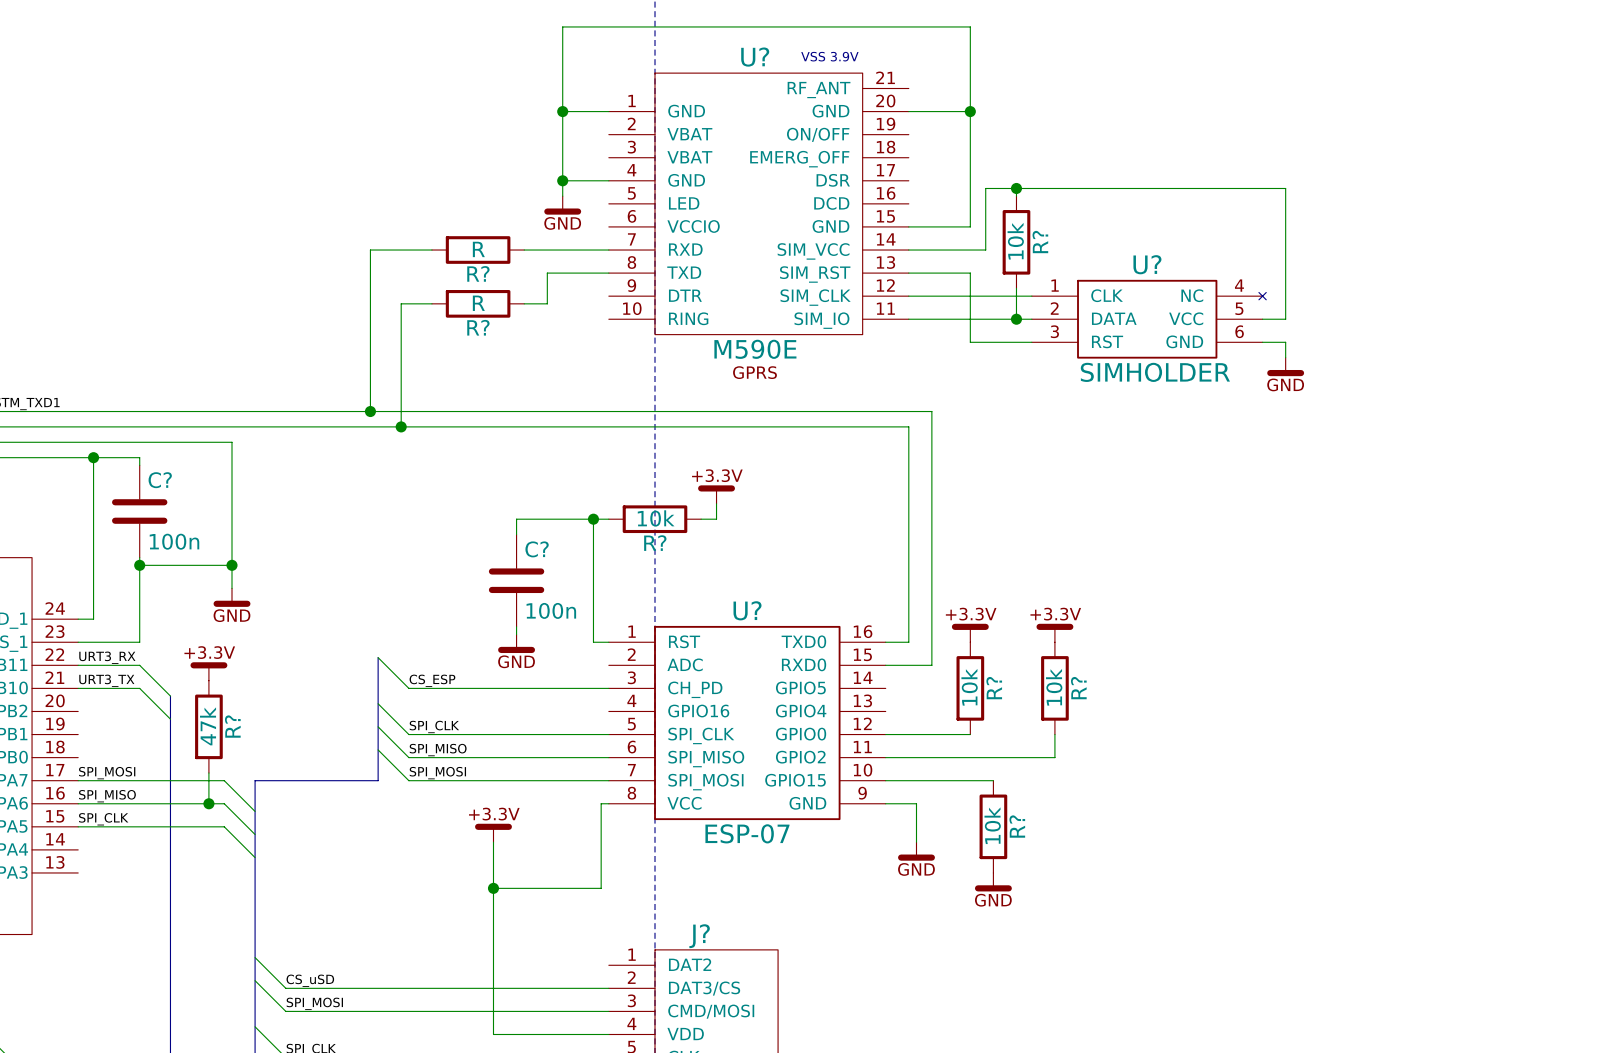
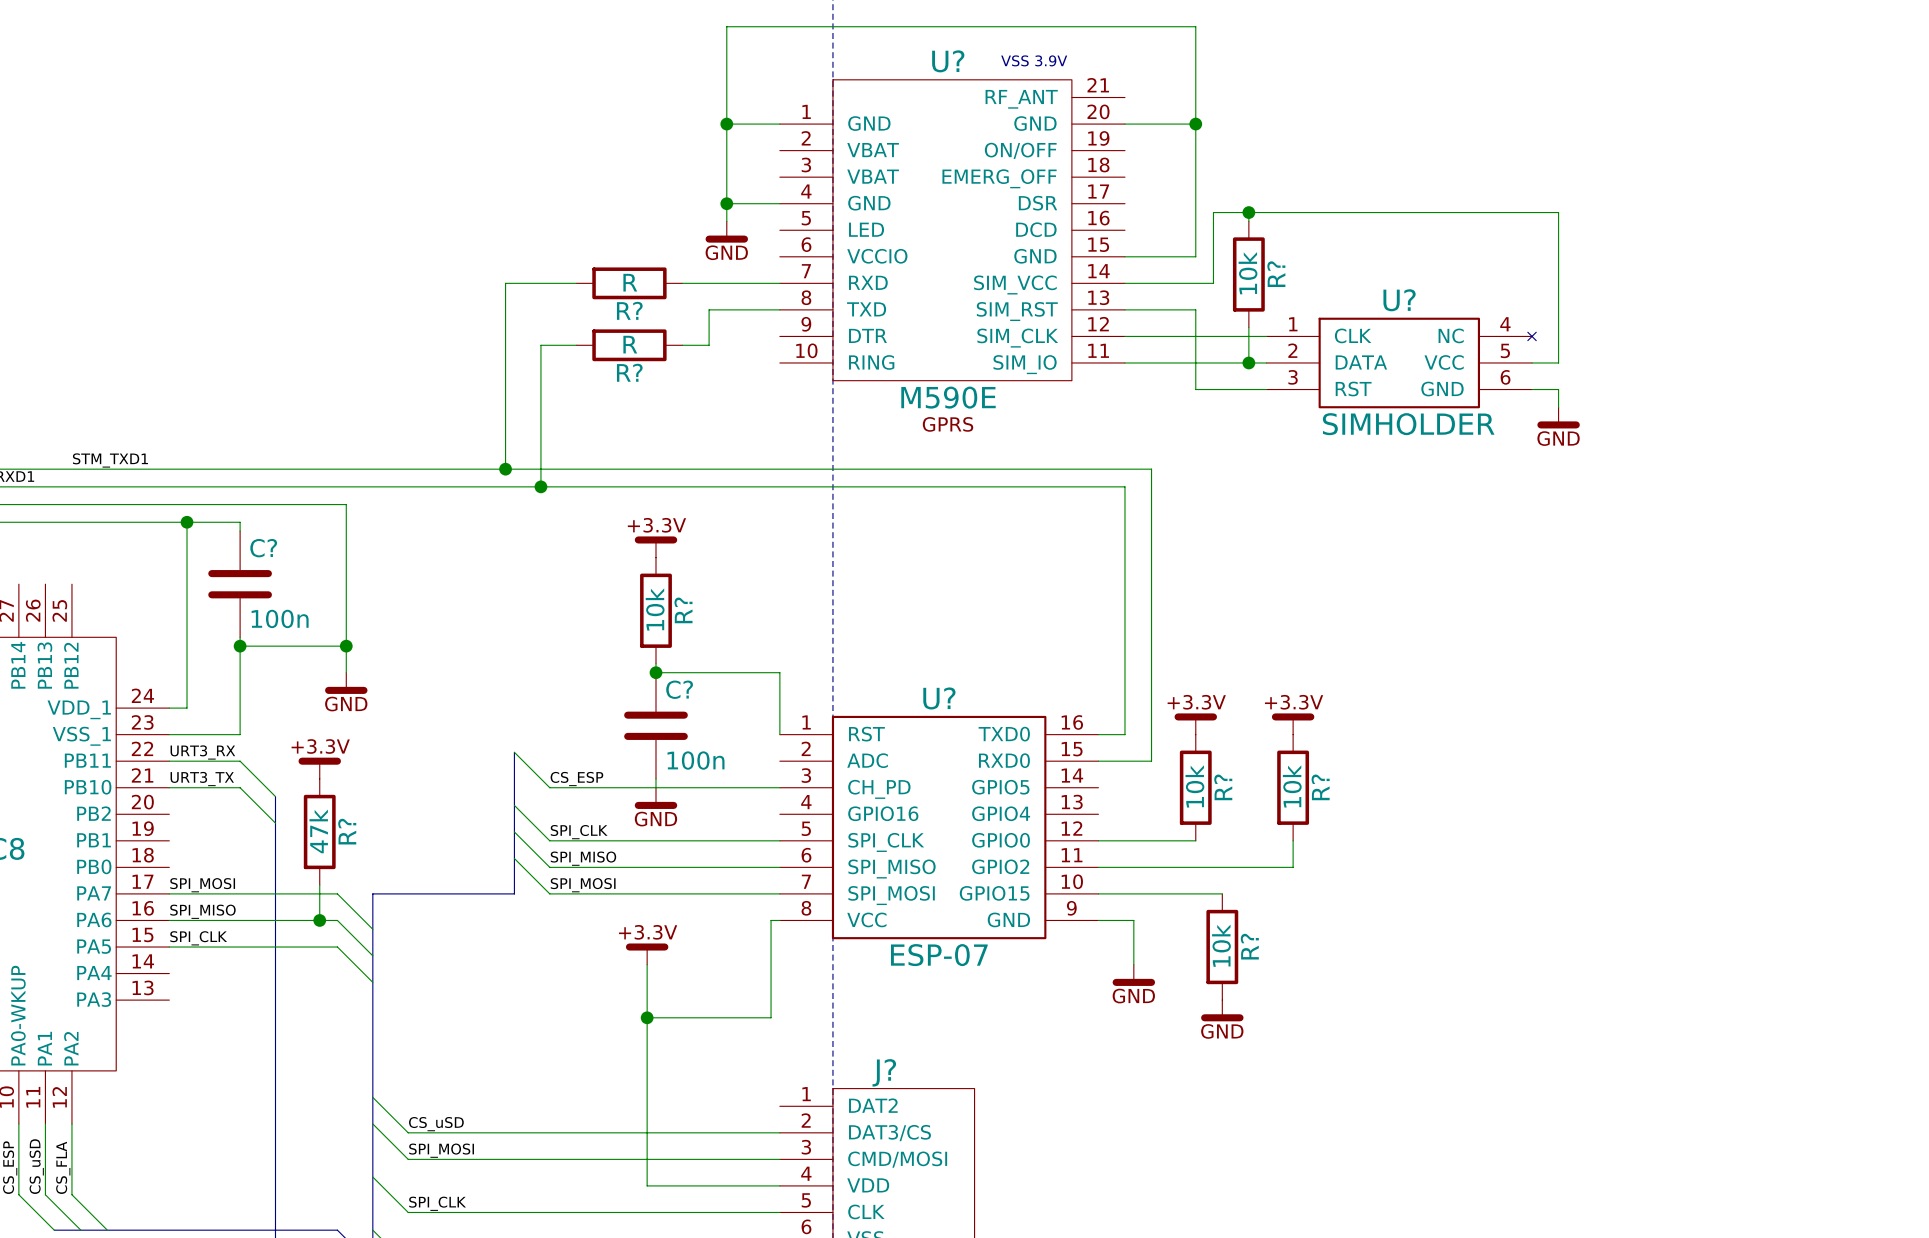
power symbol position: (716, 494) -> (655, 547)
wire: (716, 503) (716, 519) (701, 519) -> none
wire: (593, 519) (593, 642) (608, 642) -> (655, 663) (655, 672) (779, 672) (779, 734)
junction: (593, 519) -> none
wire: (608, 519) (516, 519) (516, 534) -> none
R? rotation: 0° (655, 519) -> 90° clockwise (655, 610)
R? position: (655, 519) -> (655, 610)
R? name position: R? (655, 543) -> R? (683, 610)
C? position: (516, 580) -> (655, 725)
junction: none -> (655, 672)
wire: (516, 626) (516, 634) -> (655, 778) (655, 787)
power symbol position: (516, 643) -> (655, 798)

